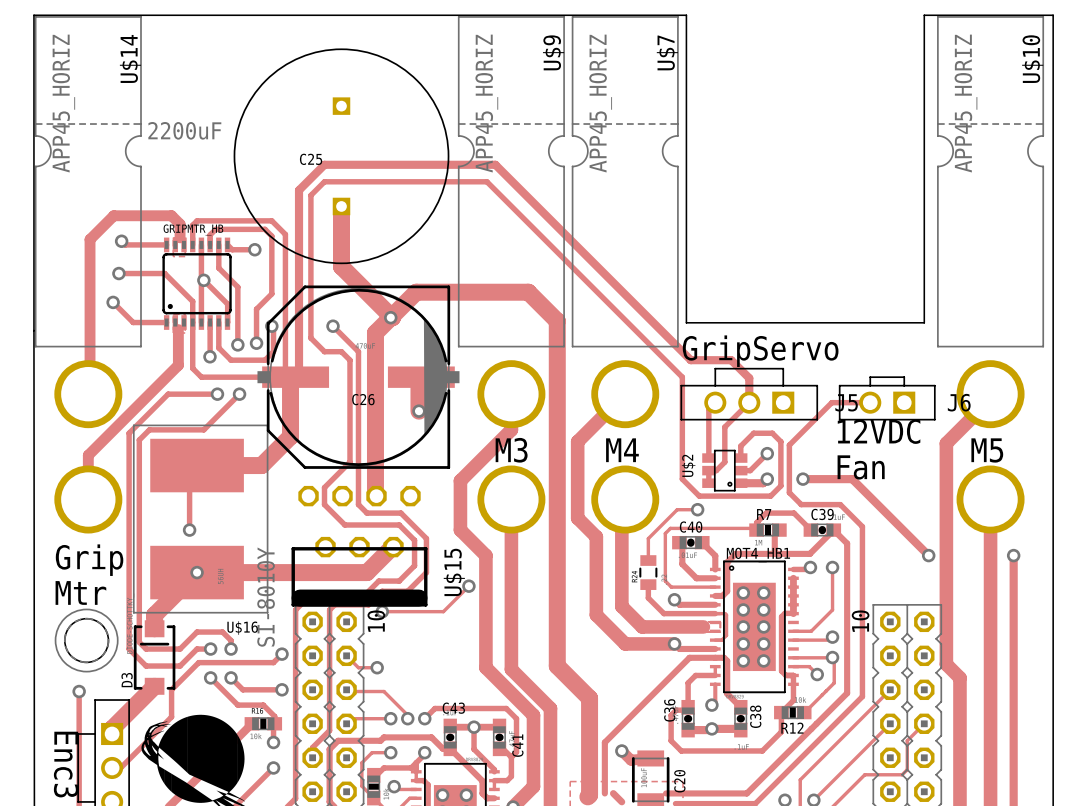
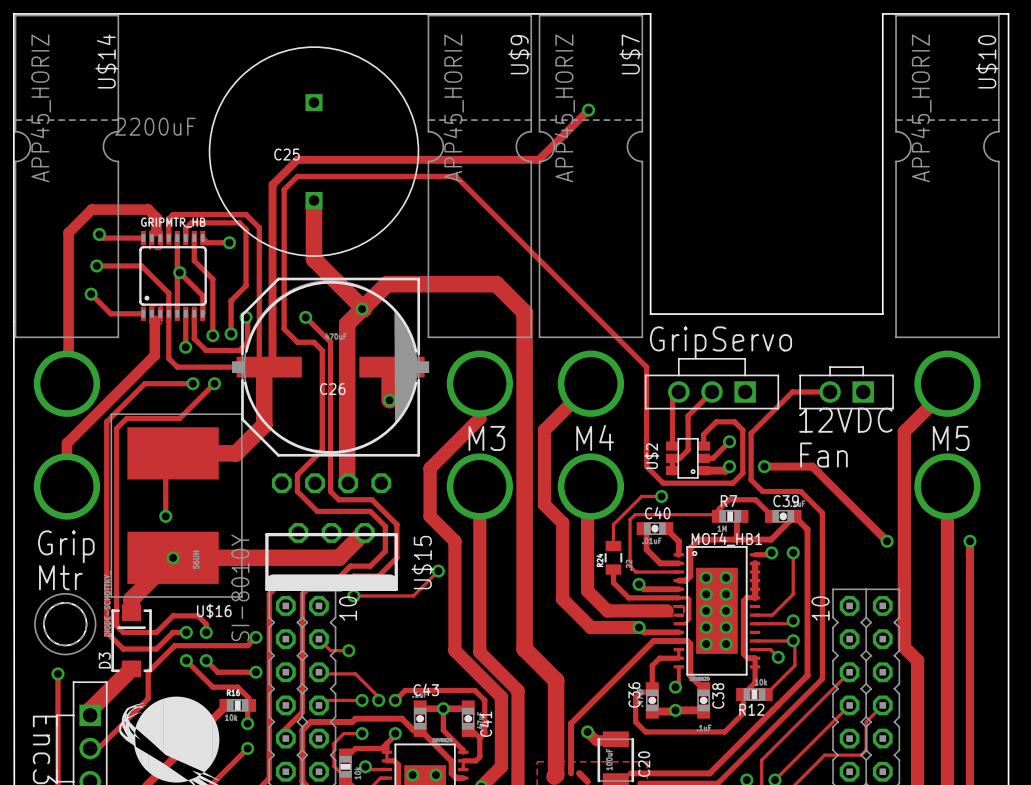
via: none -> (588, 110)
track: (495, 164) (690, 360) (731, 360) (749, 378) (749, 402) -> (464, 159) (538, 159) (588, 110)
J5 name: J5 (846, 402) -> none
J6 name: J6 (959, 402) -> none

